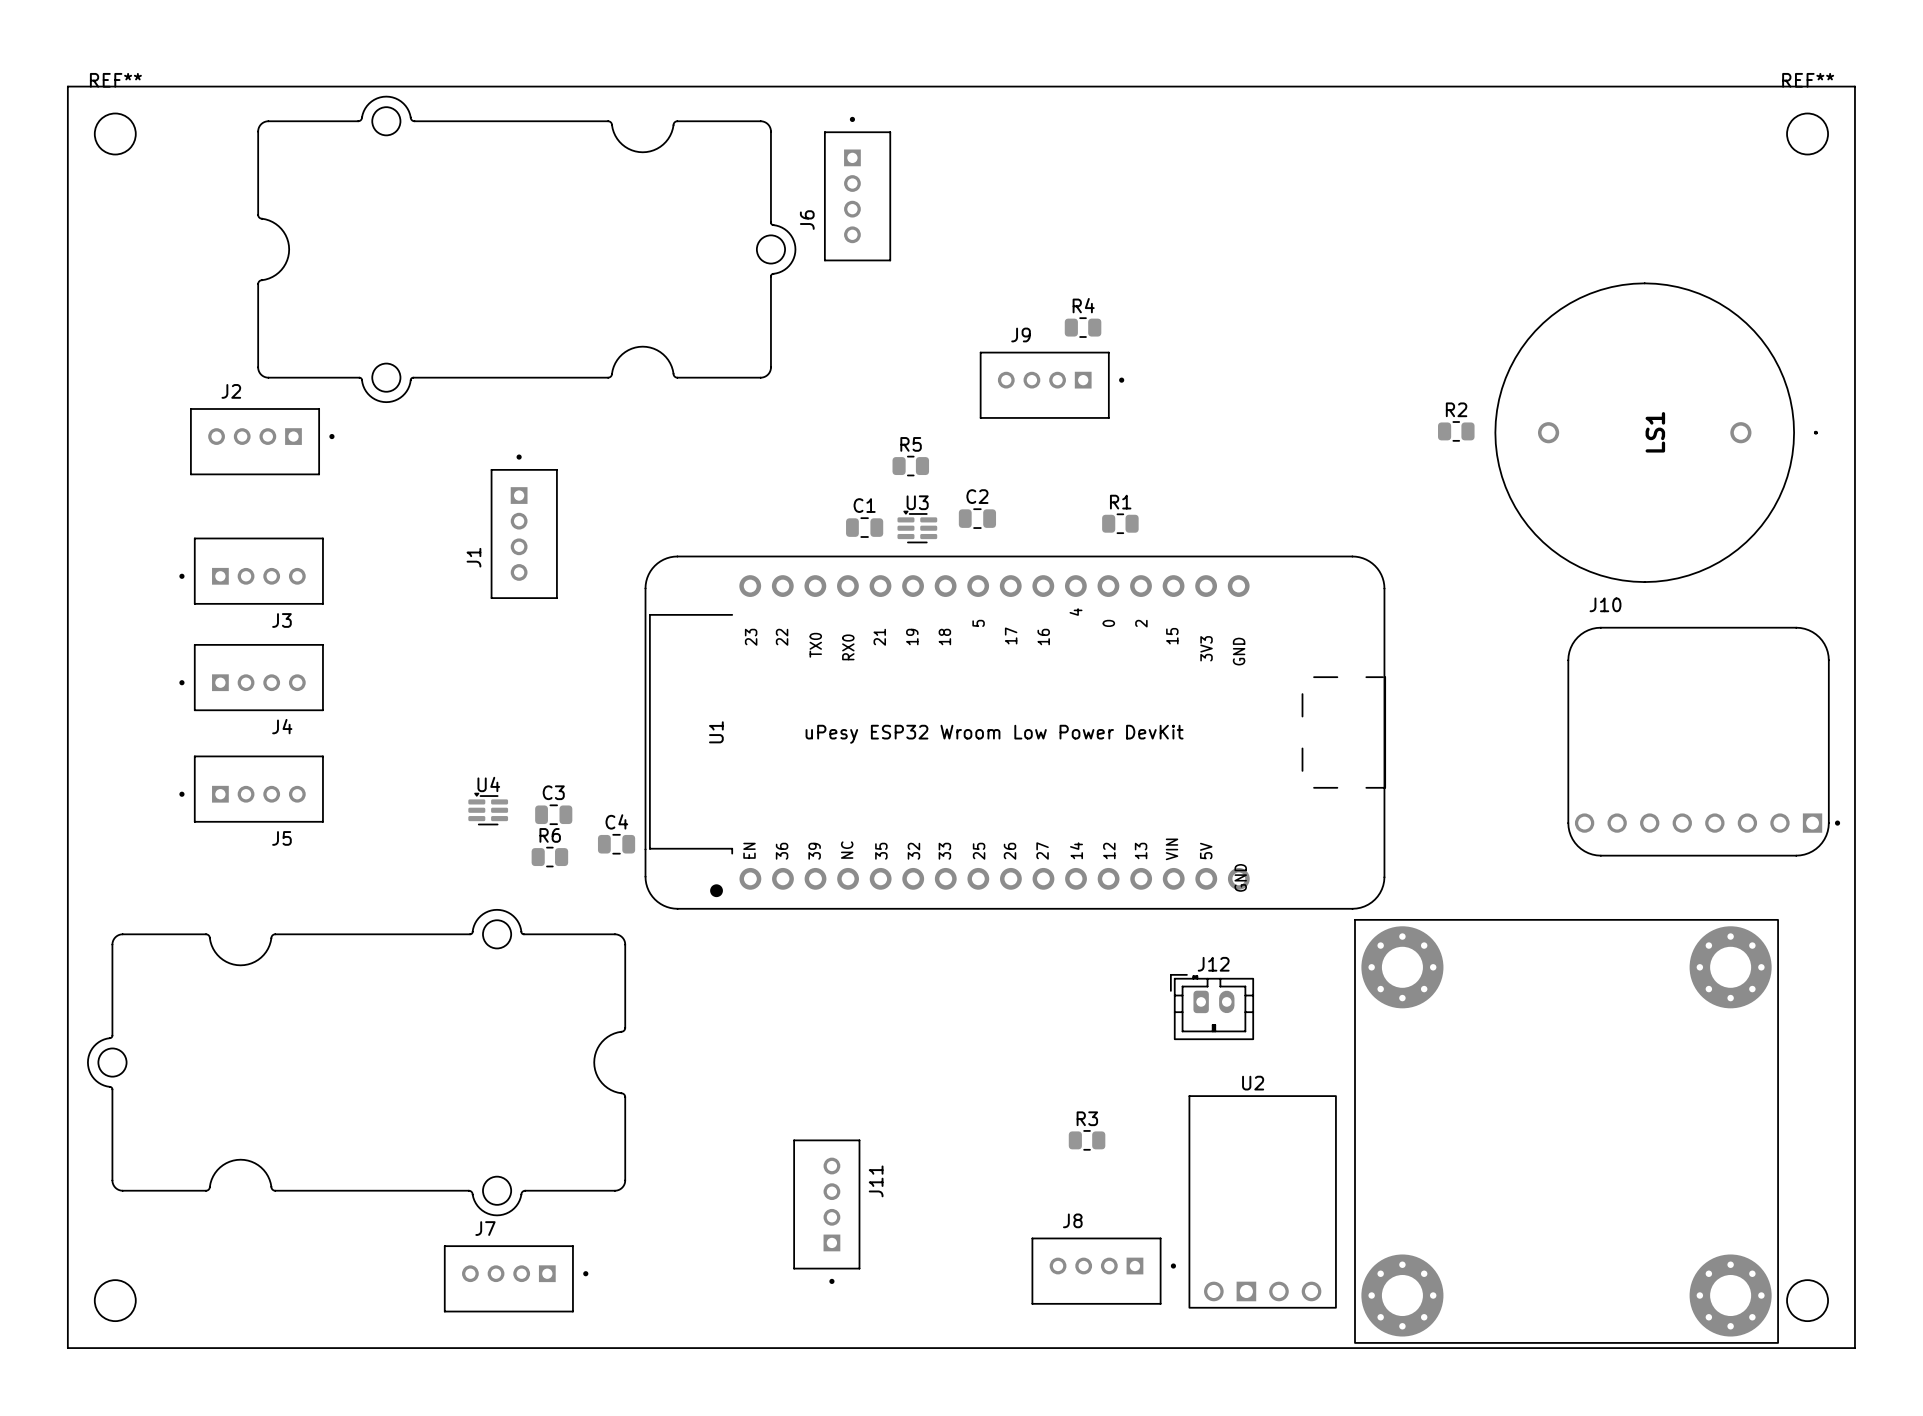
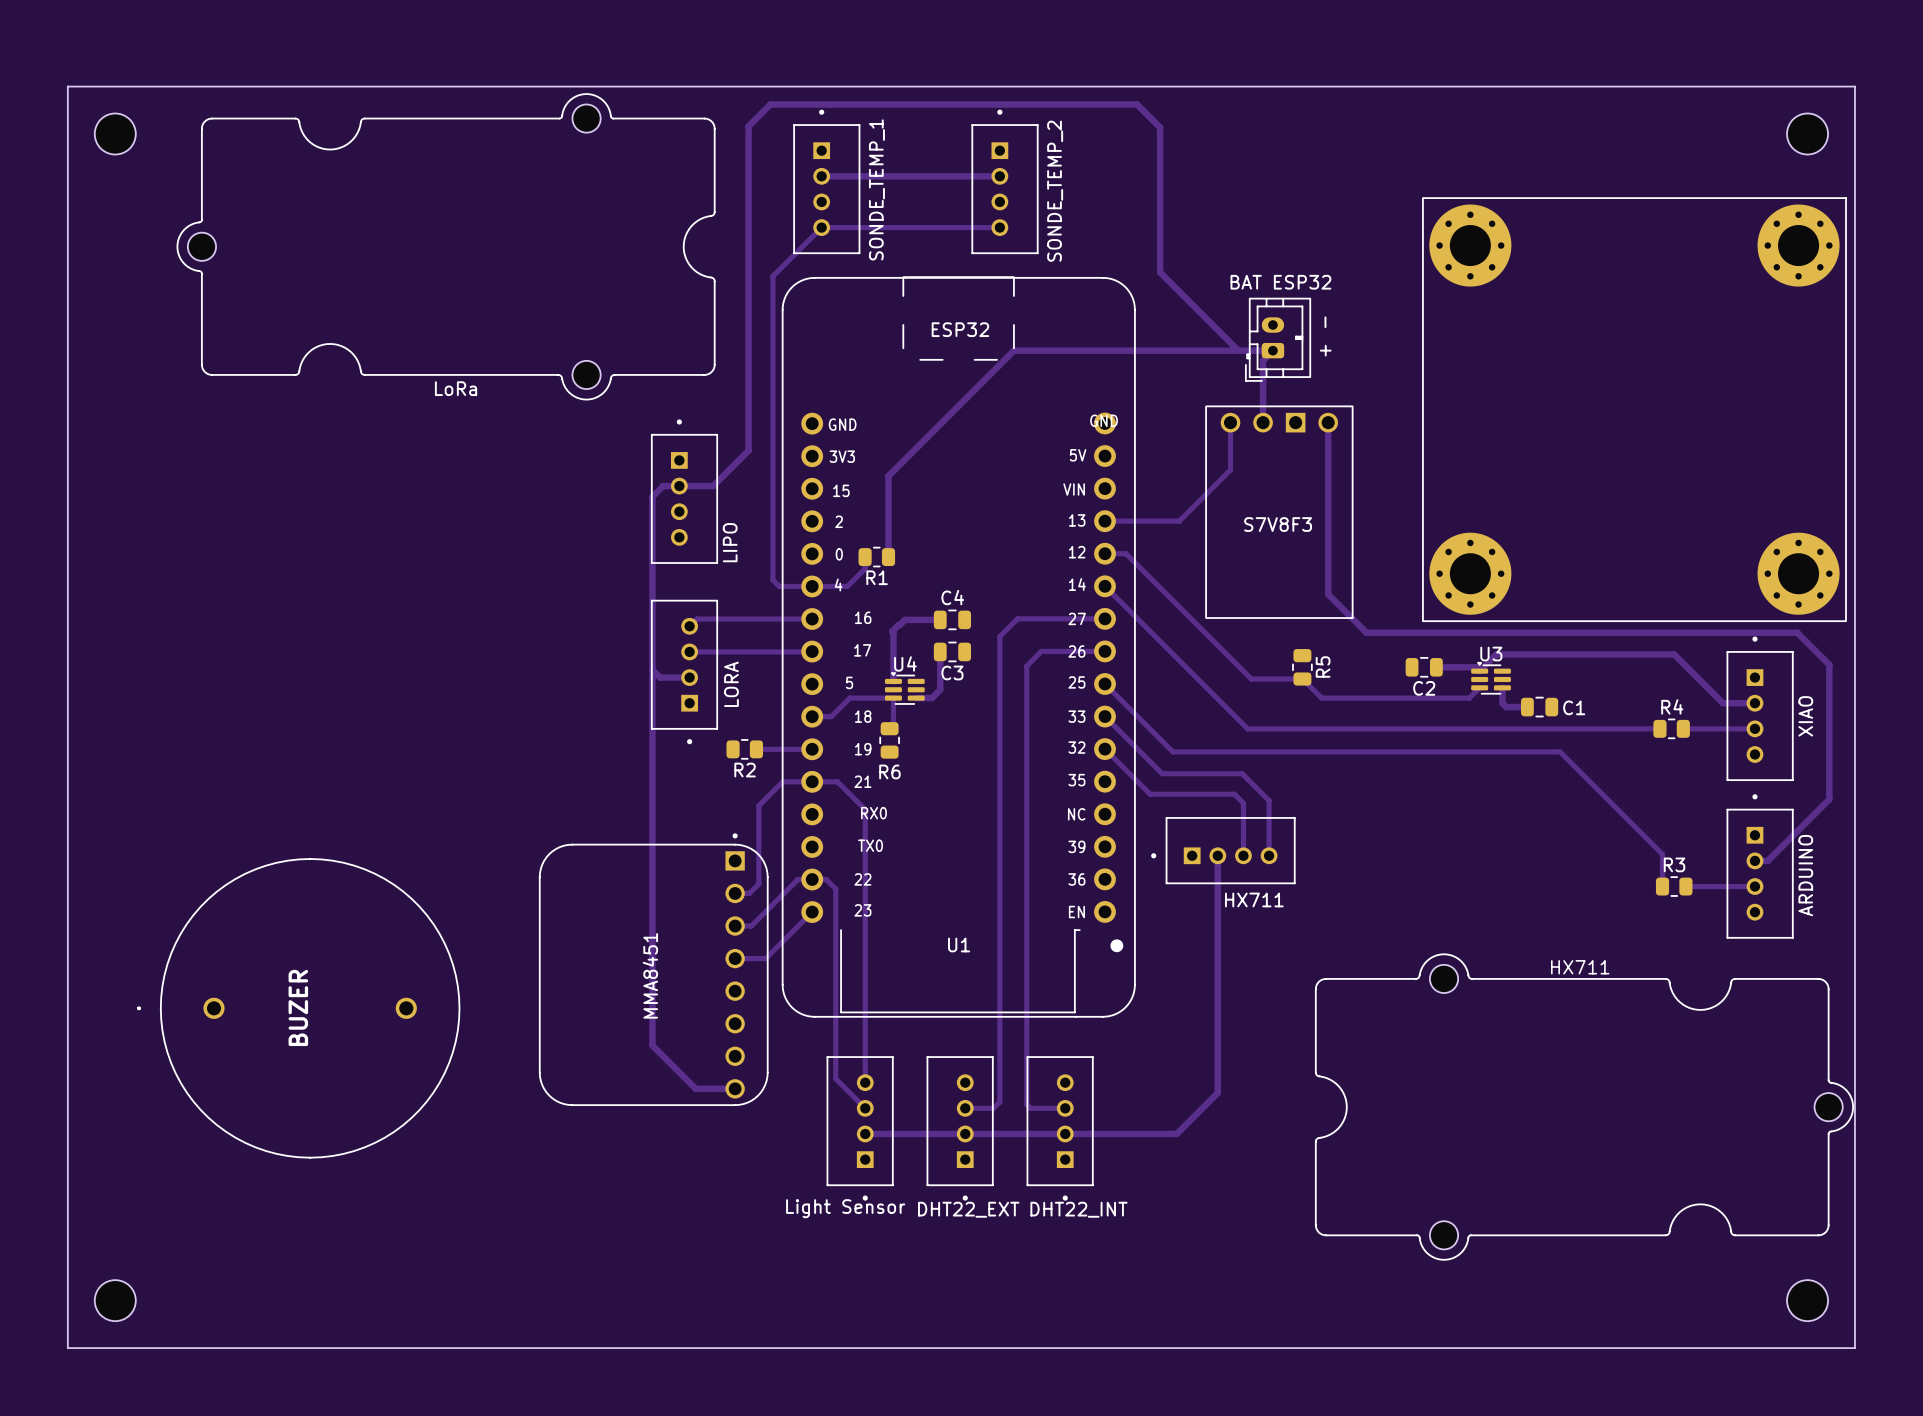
REF** name: REF** (115, 80) -> none
REF** name: REF** (1808, 80) -> none
track: none -> (821, 176) (999, 176)
part: none -> SONDE_TEMP_1 (826, 181)
part: none -> SONDE_TEMP_2 (1005, 181)
J6: (857, 189) -> none
track: none -> (999, 227) (821, 227) (772, 276) (772, 580) (779, 586) (847, 586) (865, 568) (865, 557)
part: none -> LoRa (446, 246)
part: (526, 249) -> none
text: none -> - (1325, 322)
R4 position: (1083, 327) -> (1671, 728)
BAT ESP32: none -> (1278, 339)
track: none -> (1238, 350) (1160, 272) (1160, 127) (1137, 104) (770, 104) (748, 126) (748, 450) (713, 486) (663, 486) (652, 496) (652, 1045) (695, 1088) (735, 1088)
text: none -> + (1325, 350)
J9: (1052, 385) -> none
R2 name position: R2 (1456, 409) -> R2 (745, 770)
part: none -> (1634, 409)
track: none -> (1230, 422) (1230, 470) (1179, 521) (1105, 521)
track: none -> (1263, 422) (1263, 360) (1272, 350) (1013, 350) (888, 476) (888, 557)
track: none -> (1328, 422) (1328, 594) (1366, 632) (1797, 632) (1829, 664) (1829, 799) (1767, 860) (1754, 860)
R2 position: (1456, 431) -> (744, 749)
LS1: (1656, 432) -> none
J2: (262, 441) -> none
R5 rotation: 0° (910, 466) -> 90° clockwise (1302, 667)
R5 position: (910, 466) -> (1302, 667)
part: none -> LIPO (684, 491)
C2 name position: C2 (977, 496) -> C2 (1424, 688)
R1 name position: R1 (1120, 502) -> R1 (877, 577)
C1 name position: C1 (864, 505) -> C1 (1574, 707)
part: none -> S7V8F3 (1279, 512)
C2 position: (977, 518) -> (1424, 667)
R1 position: (1120, 523) -> (876, 557)
J1: (524, 526) -> none
U3 position: (917, 526) -> (1491, 678)
C1 position: (864, 527) -> (1539, 707)
track: none -> (1105, 553) (1126, 553) (1251, 679) (1302, 679) (1321, 698) (1469, 698) (1479, 687)
U1 footprint: [644, 555, 1386, 910] -> [782, 276, 1136, 1018]
J3: (251, 571) -> none
track: none -> (1105, 586) (1247, 728) (1659, 728)
track: none -> (1105, 618) (1017, 618) (999, 636) (999, 1101) (993, 1108) (965, 1108)
track: none -> (812, 619) (696, 619) (689, 626)
track: none -> (940, 619) (905, 619) (892, 631) (893, 681)
track: none -> (812, 651) (689, 651)
track: none -> (940, 651) (940, 689) (931, 698) (916, 698)
track: none -> (1104, 651) (1041, 651) (1026, 666) (1026, 1104) (1030, 1108) (1065, 1108)
track: none -> (1436, 667) (1475, 667) (1479, 671) (1496, 654) (1674, 654) (1722, 703) (1754, 703)
track: none -> (652, 669) (660, 677) (689, 677)
part: none -> LORA (684, 672)
J4: (251, 677) -> none
track: none -> (1105, 683) (1172, 751) (1560, 751) (1662, 854) (1662, 886)
track: none -> (1502, 687) (1502, 703) (1506, 707) (1527, 707)
XIAO: none -> (1760, 708)
track: none -> (812, 716) (831, 716) (849, 698) (893, 698) (893, 724) (889, 728)
track: none -> (1105, 716) (1162, 773) (1242, 773) (1269, 800) (1269, 855)
track: none -> (1683, 728) (1754, 728)
U1 name position: U1 (716, 732) -> U1 (959, 944)
J10: (1703, 741) -> none
track: none -> (756, 749) (812, 749)
track: none -> (1105, 749) (1150, 794) (1234, 794) (1243, 803) (1243, 855)
J5: (251, 789) -> none
C3 name position: C3 (553, 792) -> C3 (952, 672)
U4 position: (488, 808) -> (904, 688)
C3 position: (553, 814) -> (952, 651)
R6 name position: R6 (550, 835) -> R6 (889, 771)
C4 position: (616, 844) -> (952, 619)
HX711: none -> (1223, 850)
track: none -> (1217, 855) (1217, 1092) (1176, 1133) (865, 1133)
R6 rotation: 0° (549, 857) -> 90° clockwise (889, 740)
R6 position: (549, 857) -> (889, 740)
ARDUINO: none -> (1760, 866)
track: none -> (1685, 886) (1754, 886)
track: none -> (735, 893) (749, 893) (758, 883) (758, 805) (782, 781) (837, 781) (865, 809) (865, 1082)
track: none -> (812, 912) (765, 958) (735, 958)
track: none -> (735, 926) (751, 926) (797, 879) (826, 879) (835, 889) (835, 1078) (865, 1108)
part: none -> MMA8451 (653, 969)
J12: (1212, 1007) -> none
BUZER: none -> (298, 1008)
part: (356, 1062) -> none
part: none -> (1584, 1107)
part: none -> Light Sensor (860, 1128)
part: none -> DHT22_EXT (960, 1128)
part: none -> DHT22_INT (1060, 1128)
part: (1566, 1131) -> none
R3 position: (1087, 1140) -> (1674, 886)
U2: (1262, 1201) -> none
J11: (826, 1211) -> none
J8: (1103, 1271) -> none
J7: (516, 1278) -> none

